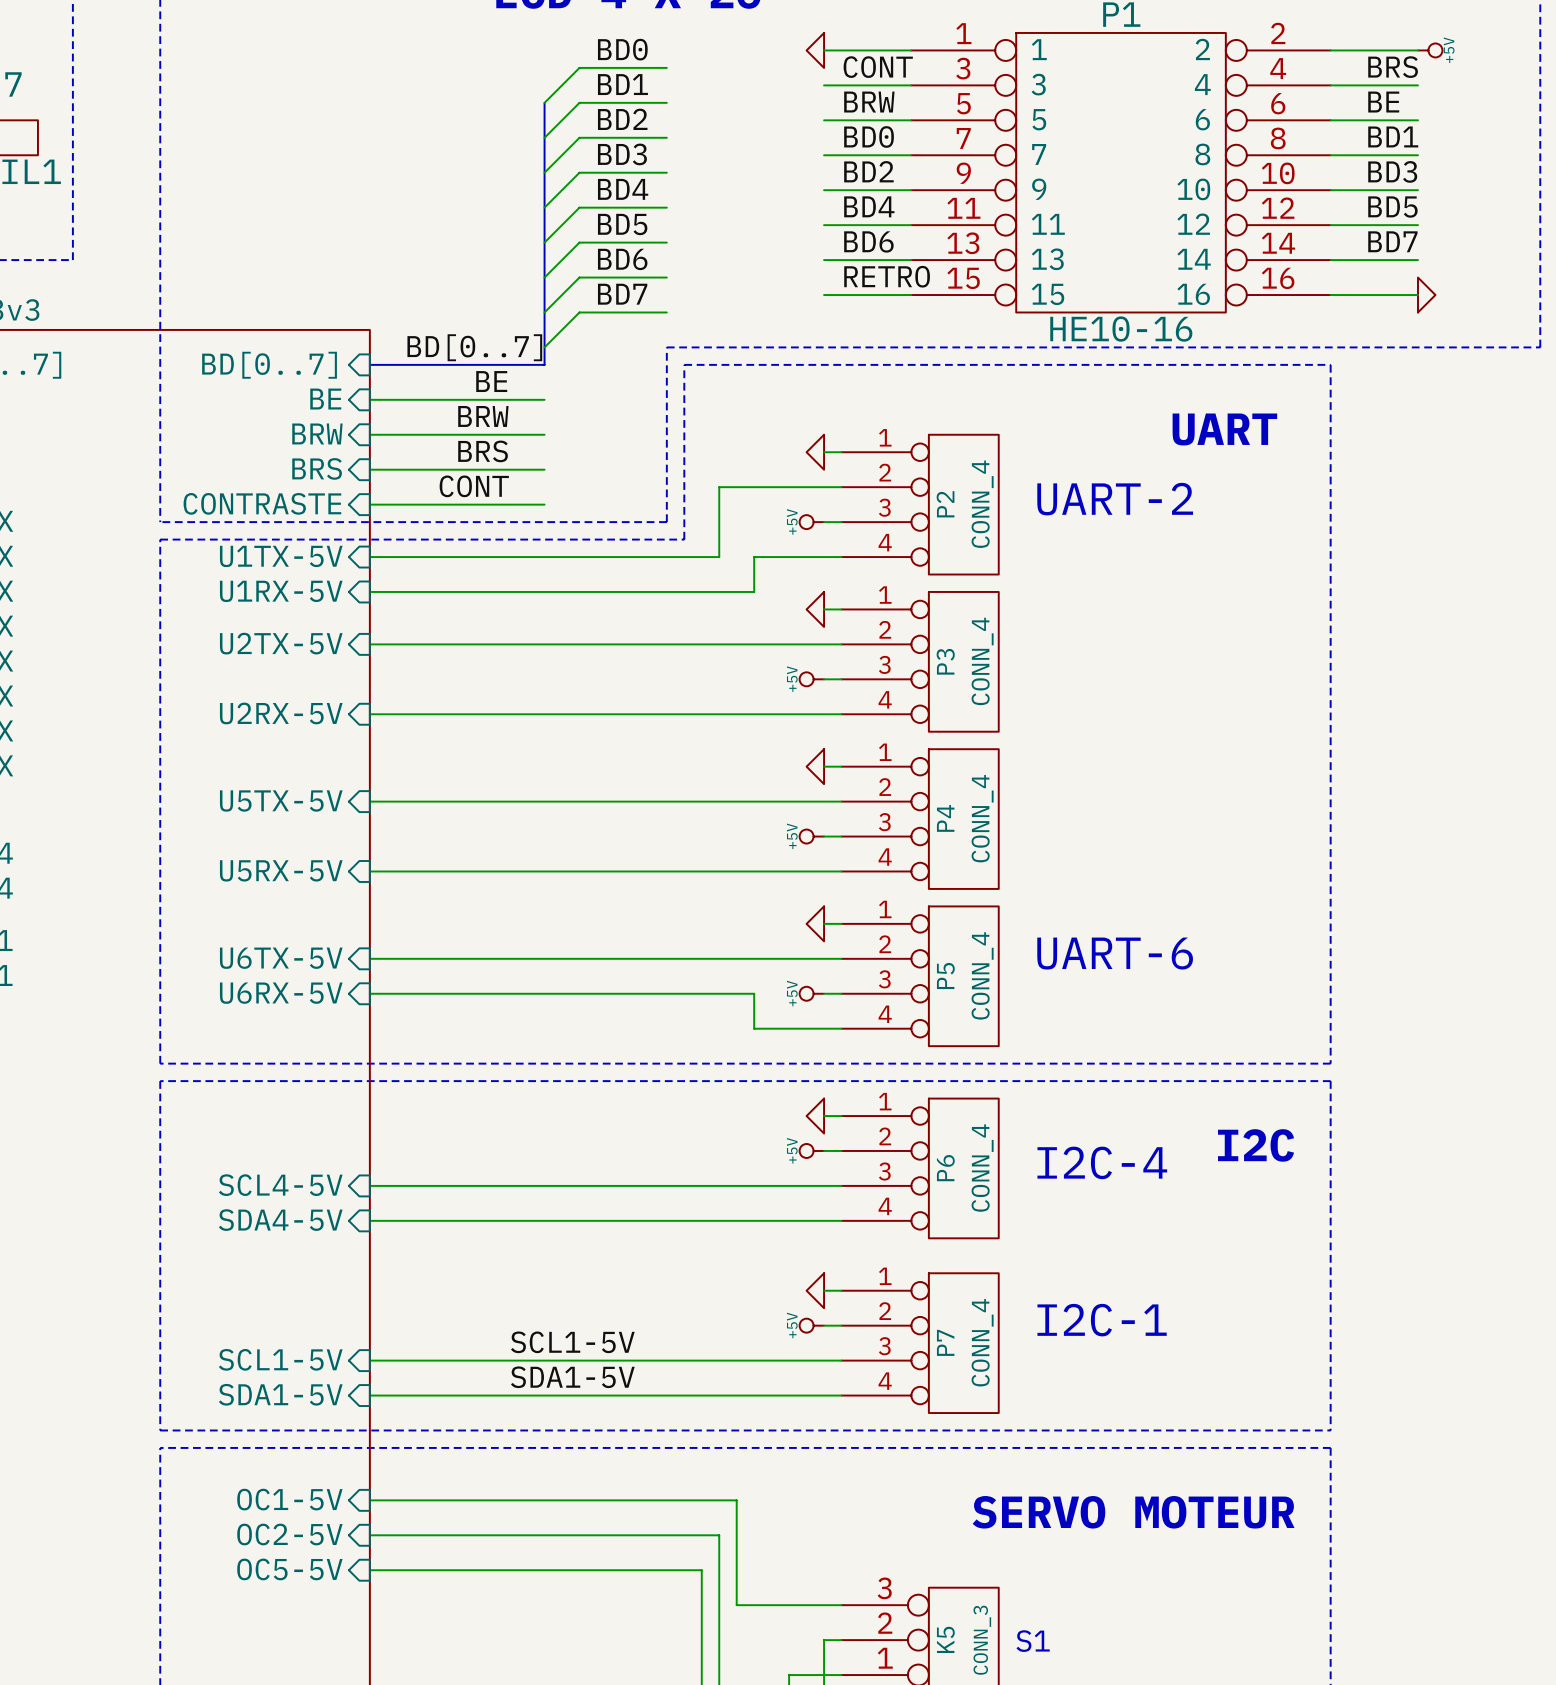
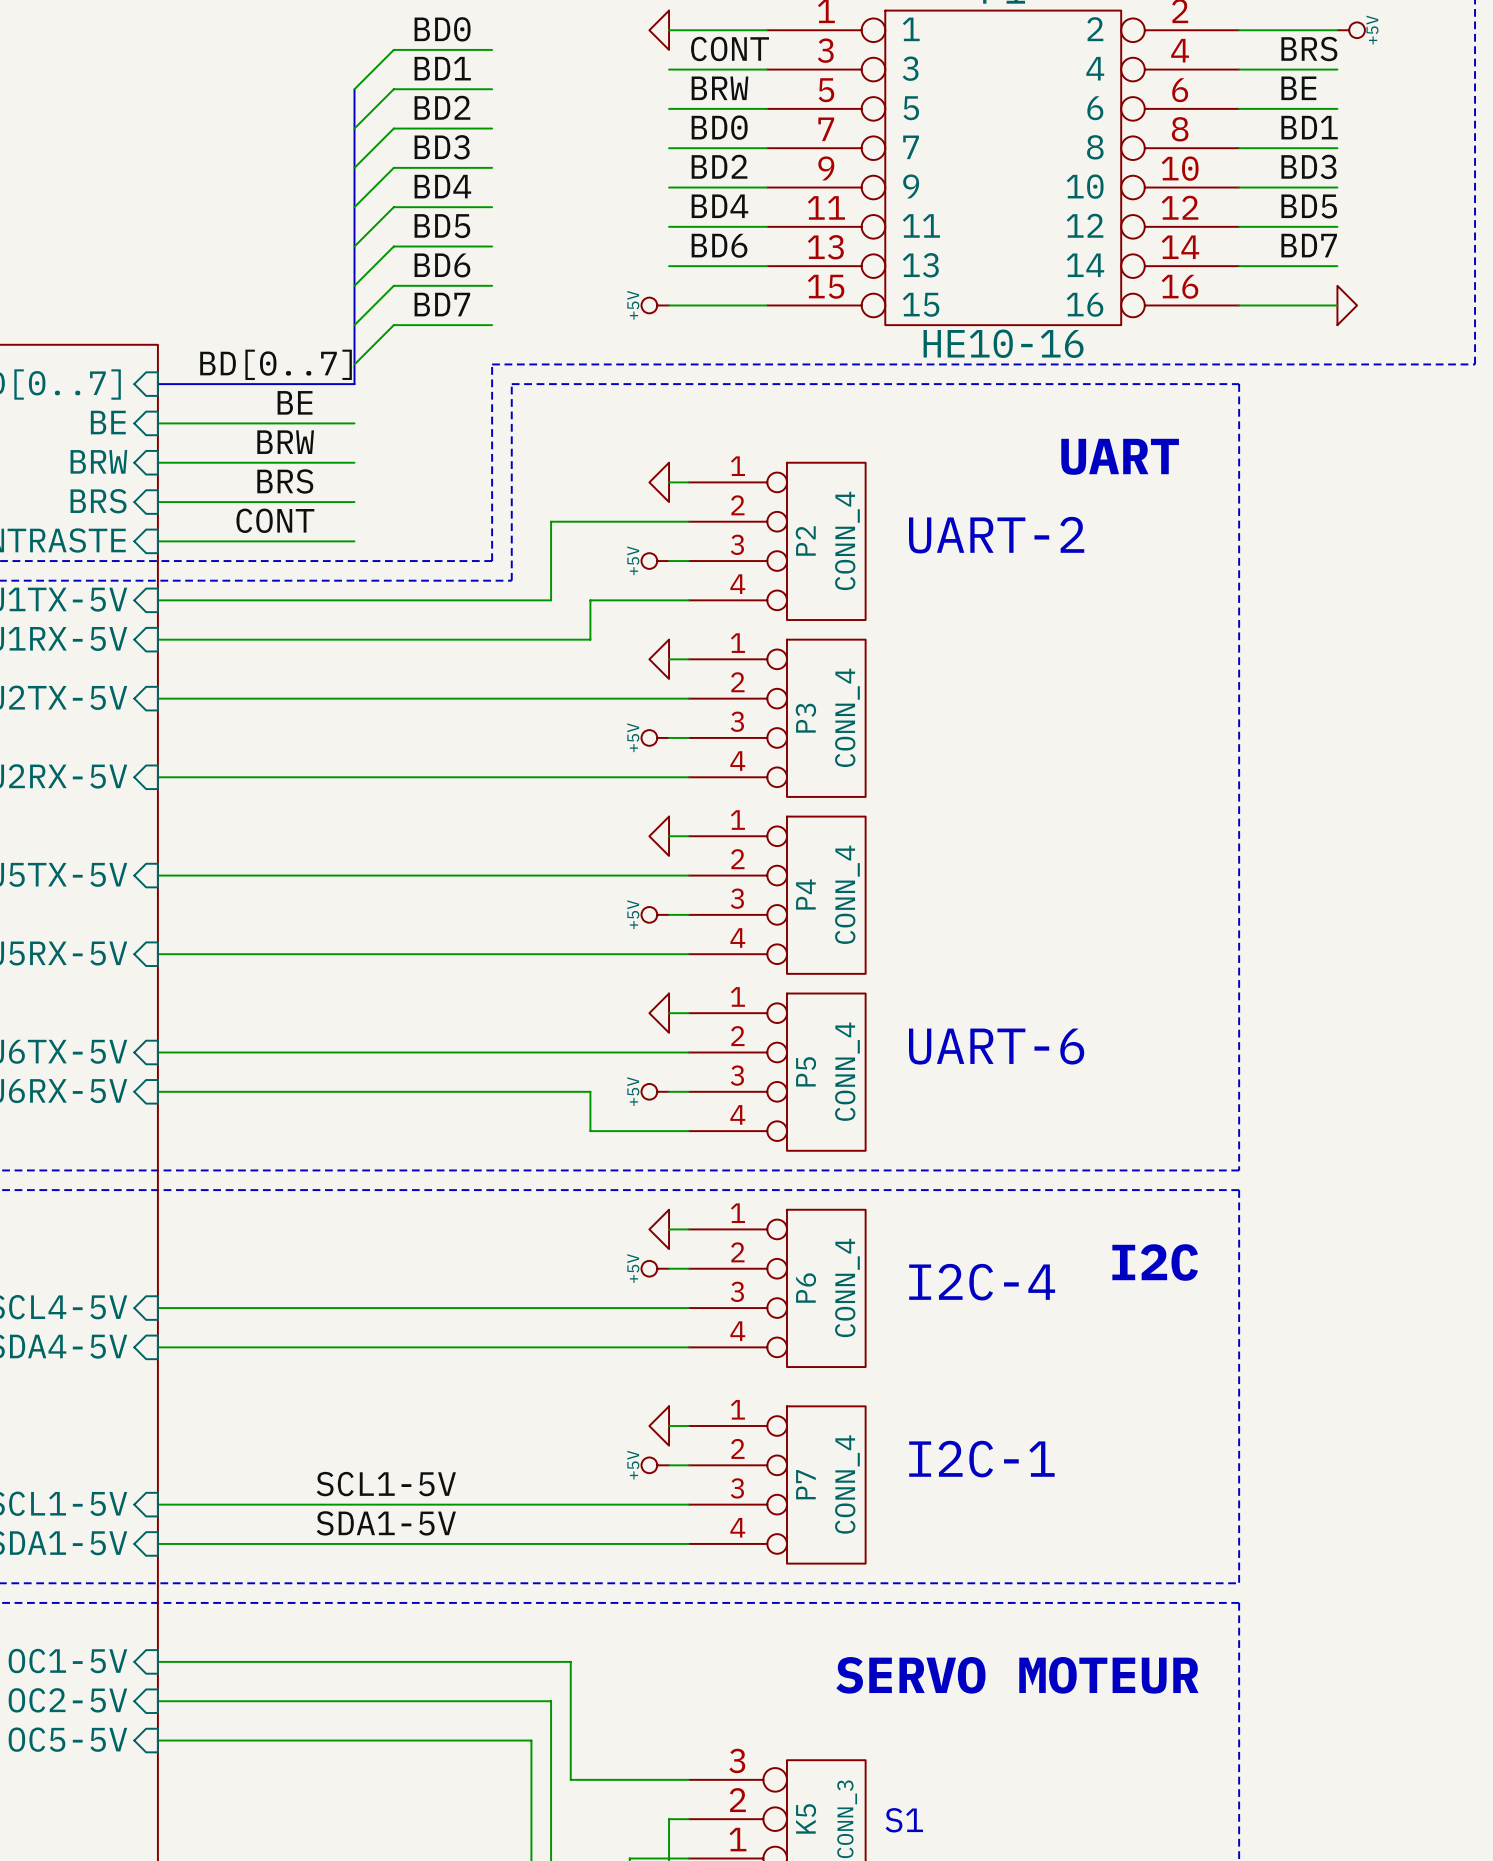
label: RETRO (887, 276) -> none
power symbol: none -> +5V (655, 305)

